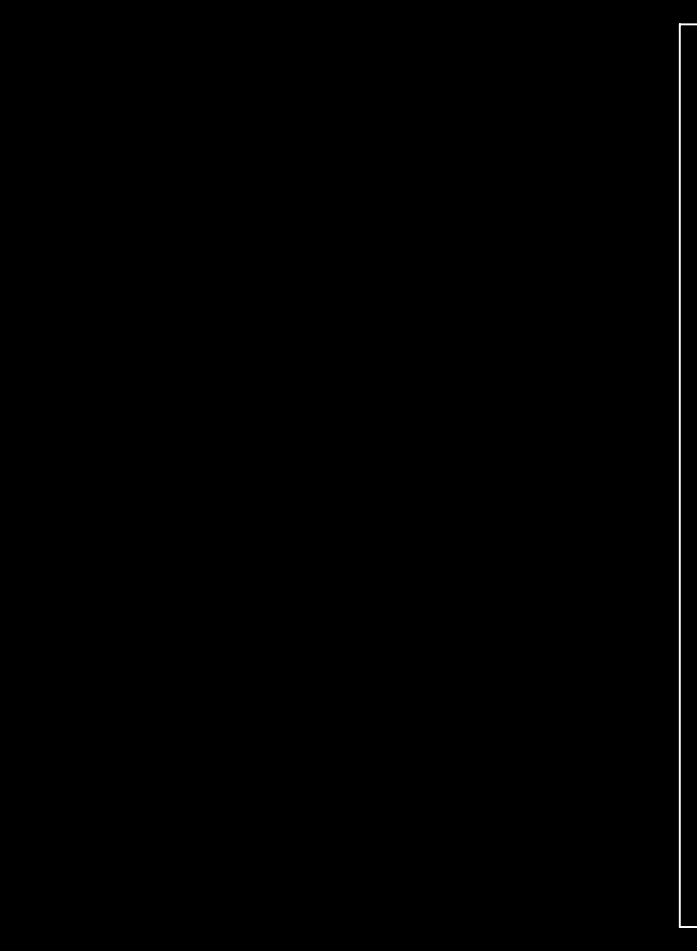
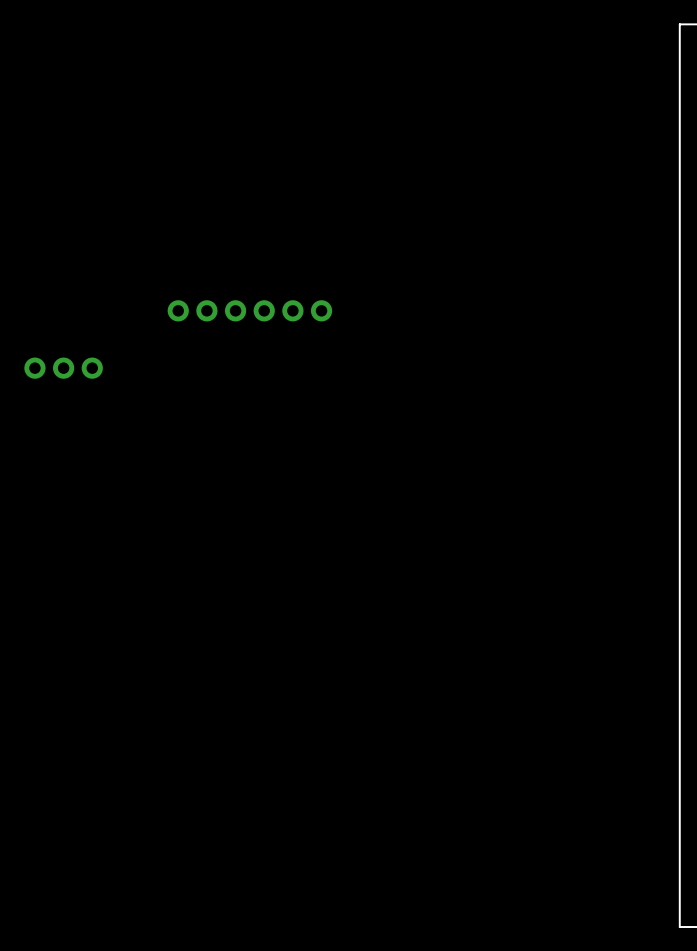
part: none -> (178, 310)
part: none -> (206, 310)
part: none -> (235, 310)
part: none -> (264, 310)
part: none -> (292, 310)
part: none -> (321, 310)
part: none -> (34, 368)
part: none -> (63, 368)
part: none -> (92, 368)

